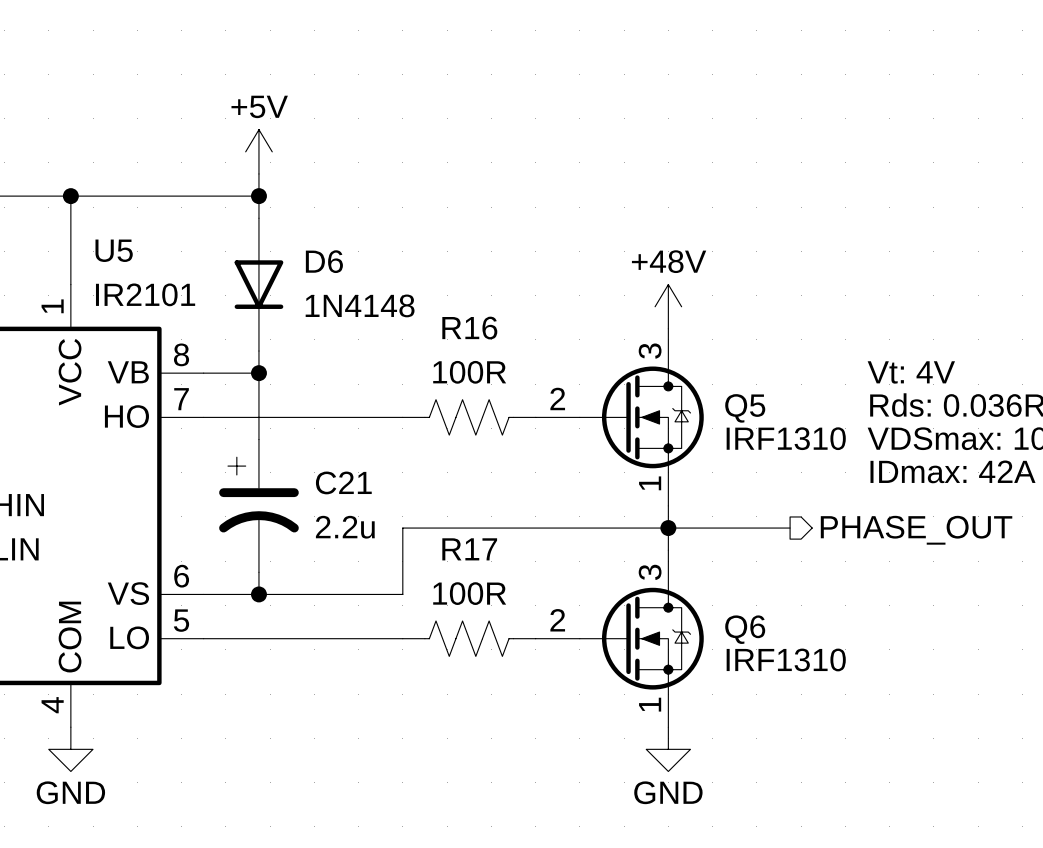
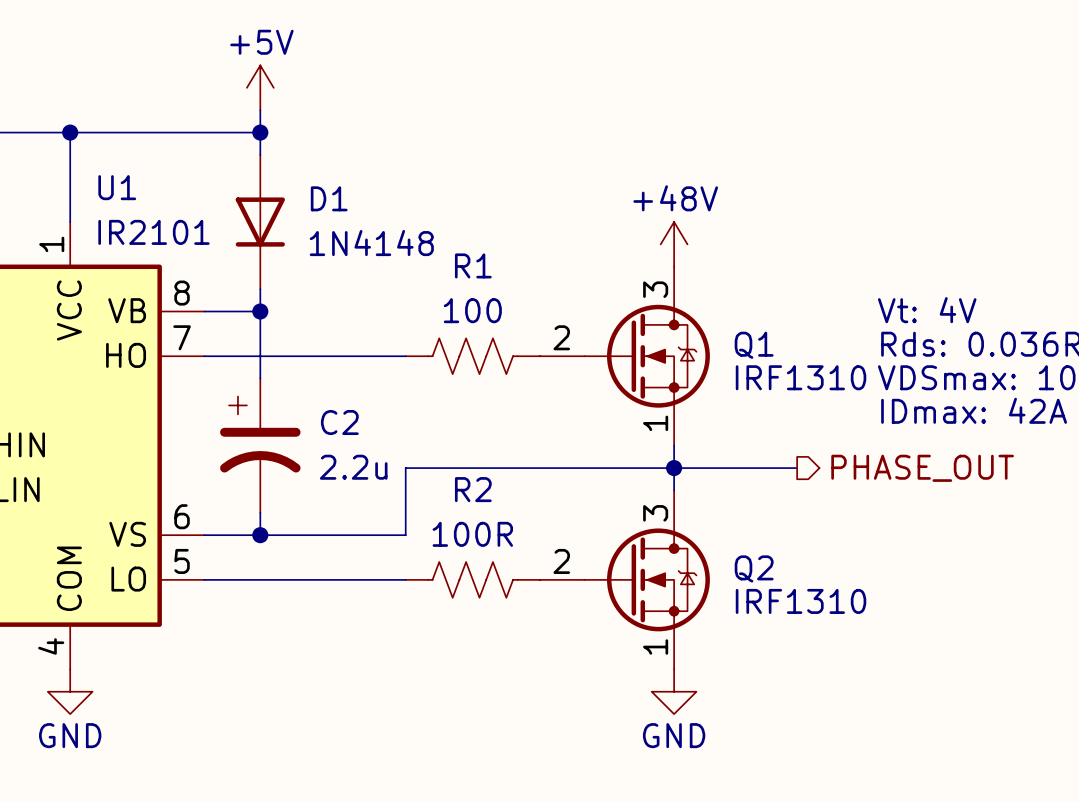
U5 name: U5 (114, 250) -> U1 (117, 187)
D6 name: D6 (324, 261) -> D1 (329, 198)
R16 name: R16 (469, 328) -> R1 (473, 265)
R16 value: 100R (469, 372) -> 100 (472, 310)
Q5 name: Q5 (745, 408) -> Q1 (754, 345)
C21 name: C21 (343, 482) -> C2 (339, 422)
R17 name: R17 (469, 549) -> R2 (473, 489)
Q6 name: Q6 (745, 629) -> Q2 (754, 568)

